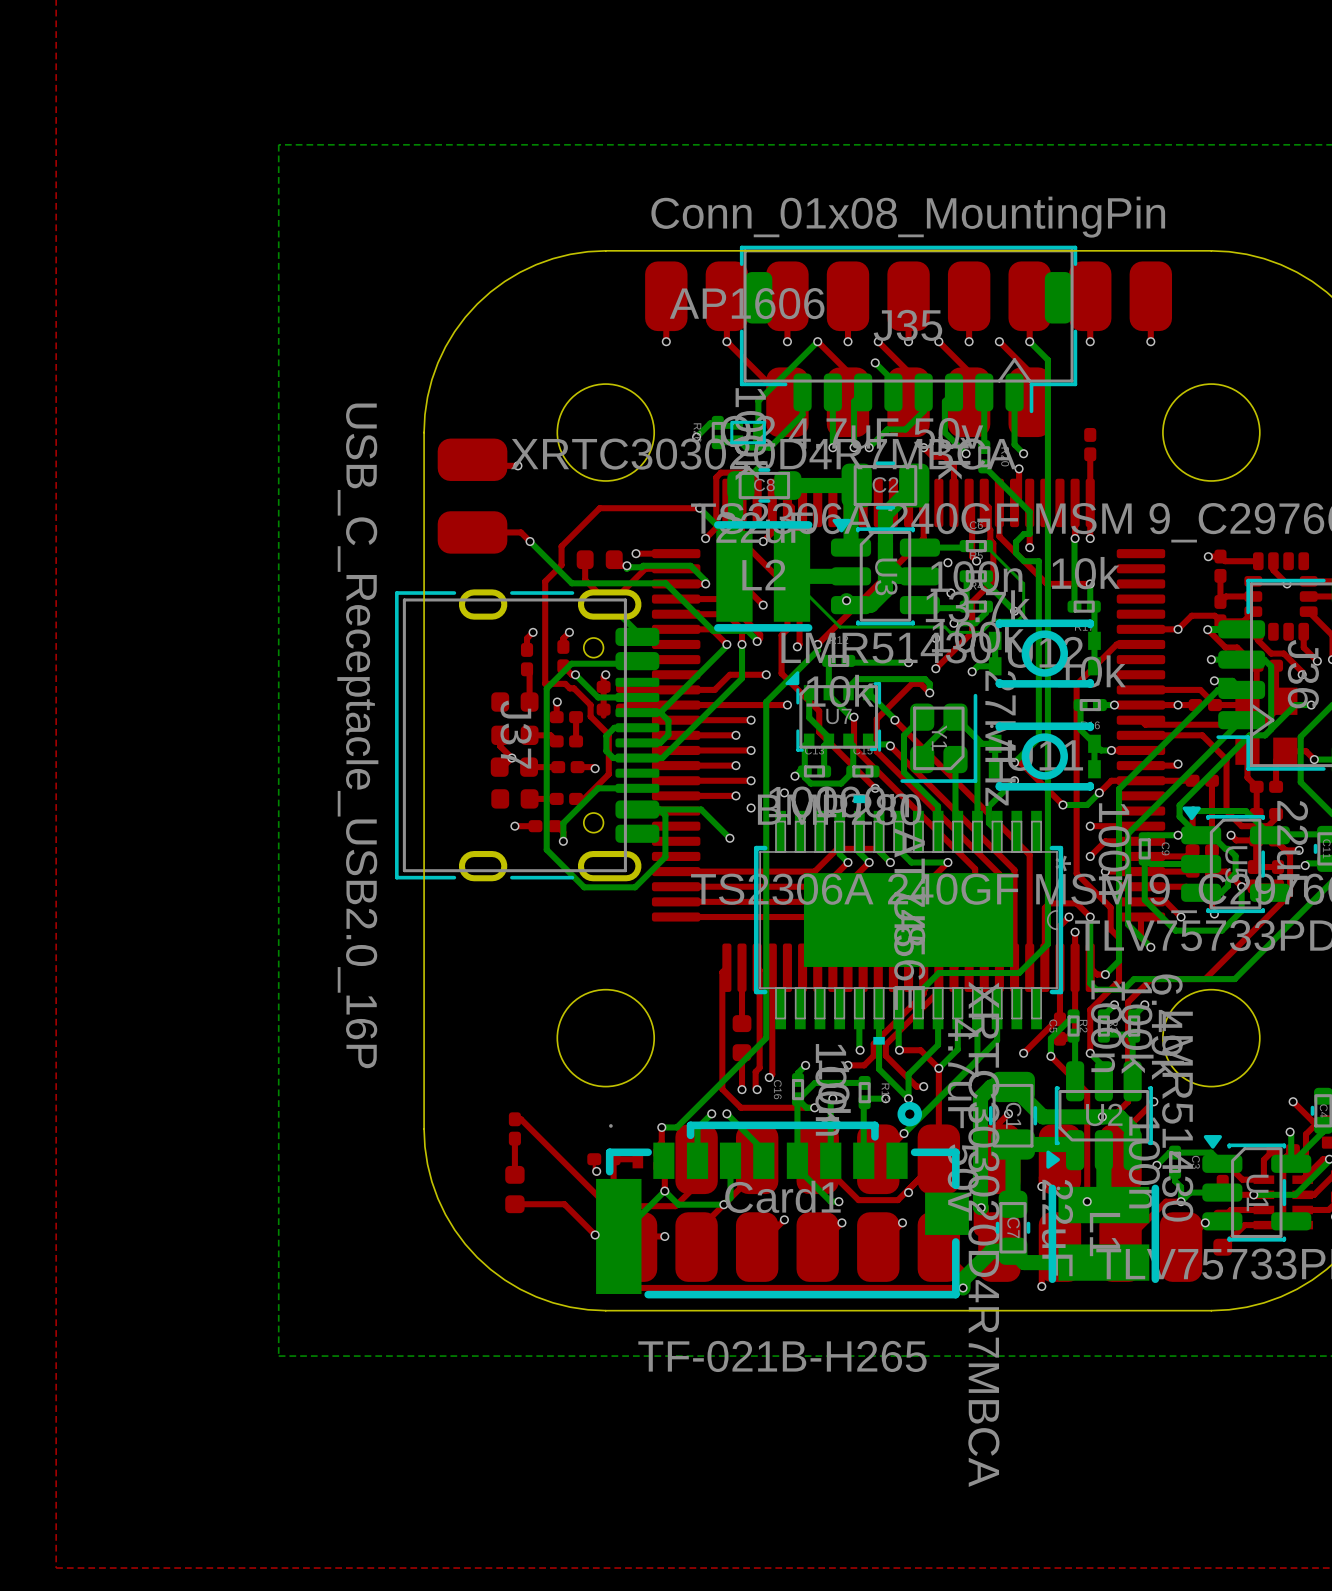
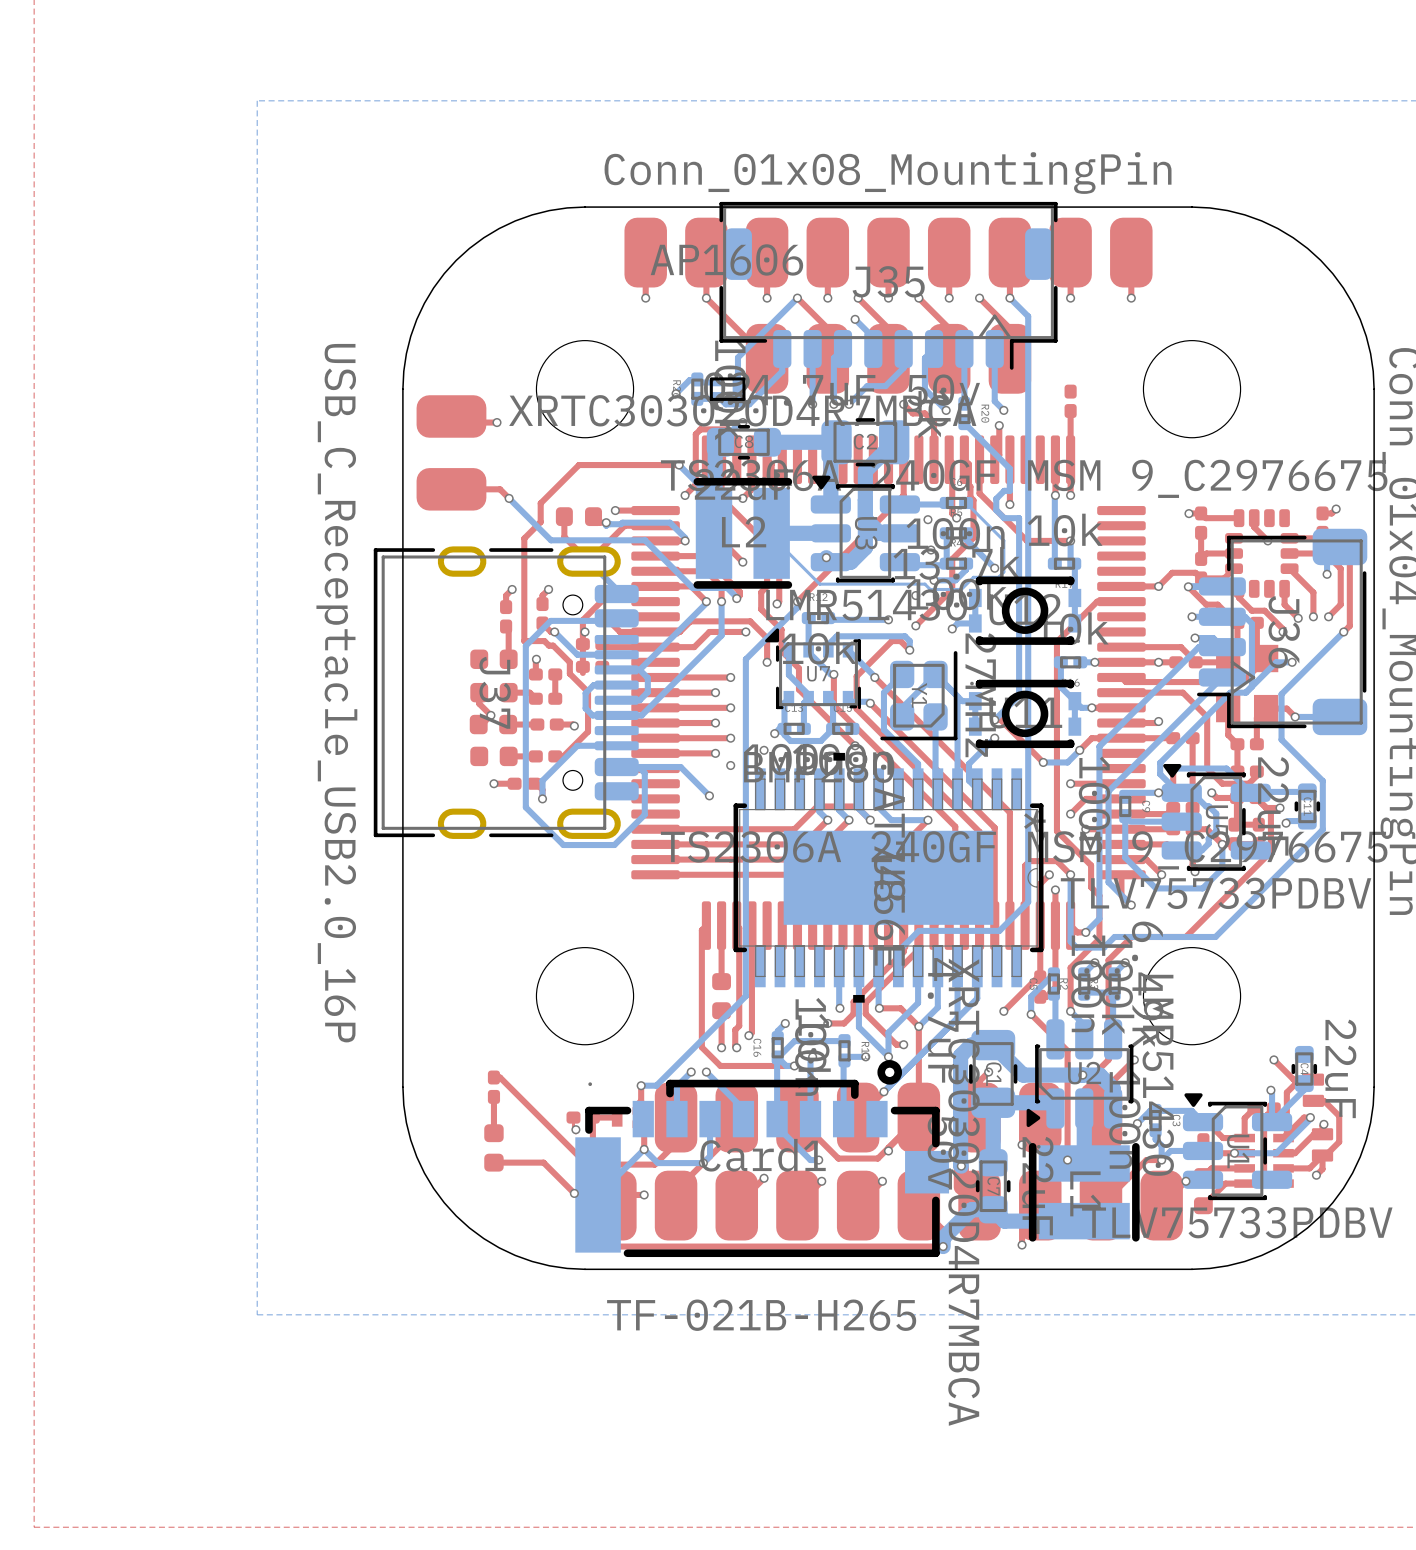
top track: none -> (604, 597) (582, 620) (582, 634)
top track: (781, 652) (781, 673) (801, 693) -> (761, 609) (781, 629) (781, 650)
top track: (787, 705) (627, 705) (623, 709) -> (767, 662) (767, 638) (750, 621) (690, 621) (679, 631) (620, 631) (605, 617)

